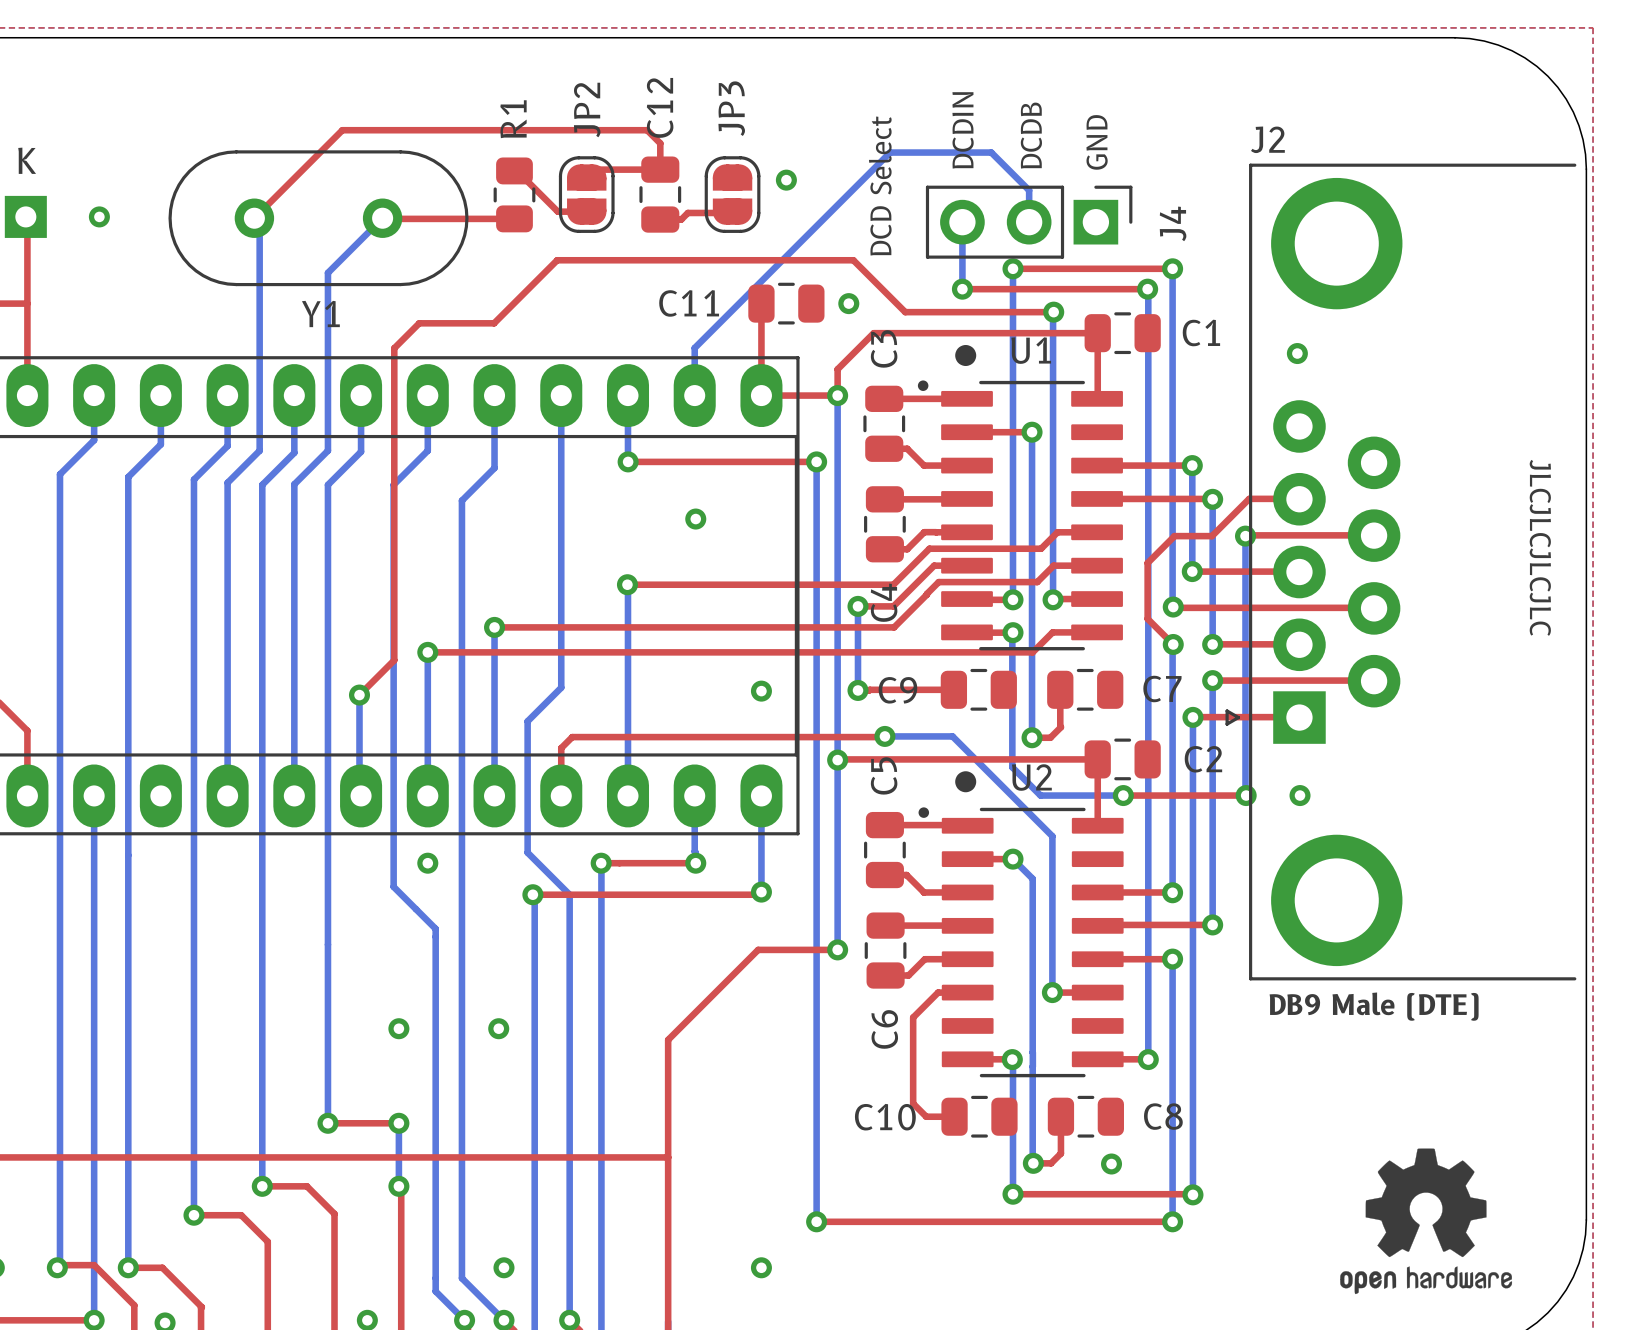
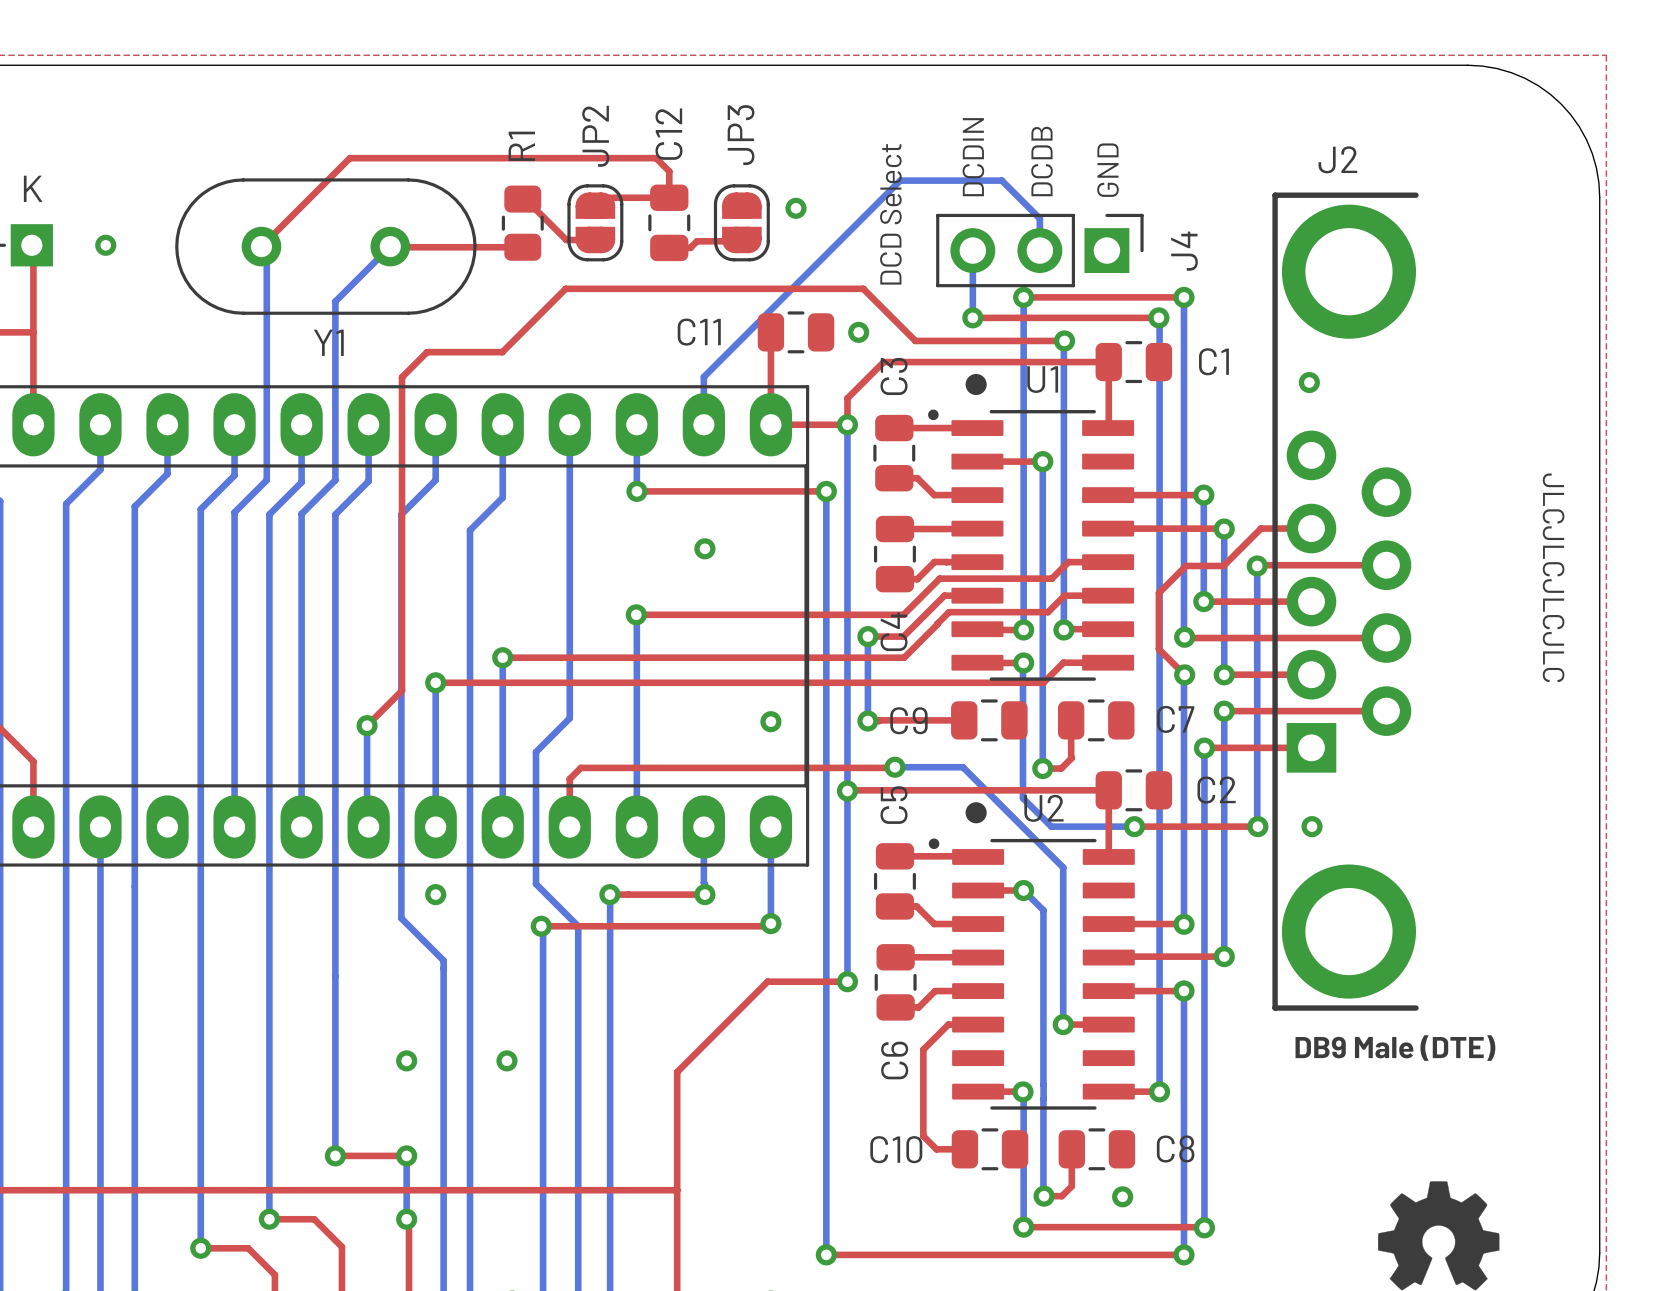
J2 name position: J2 (1267, 139) -> J2 (1337, 159)
J2 footprint: [1225, 163, 1577, 981] -> [1272, 192, 1419, 1011]
J2 value position: DB9 Male (DTE) (1374, 1006) -> DB9 Male (DTE) (1395, 1048)

